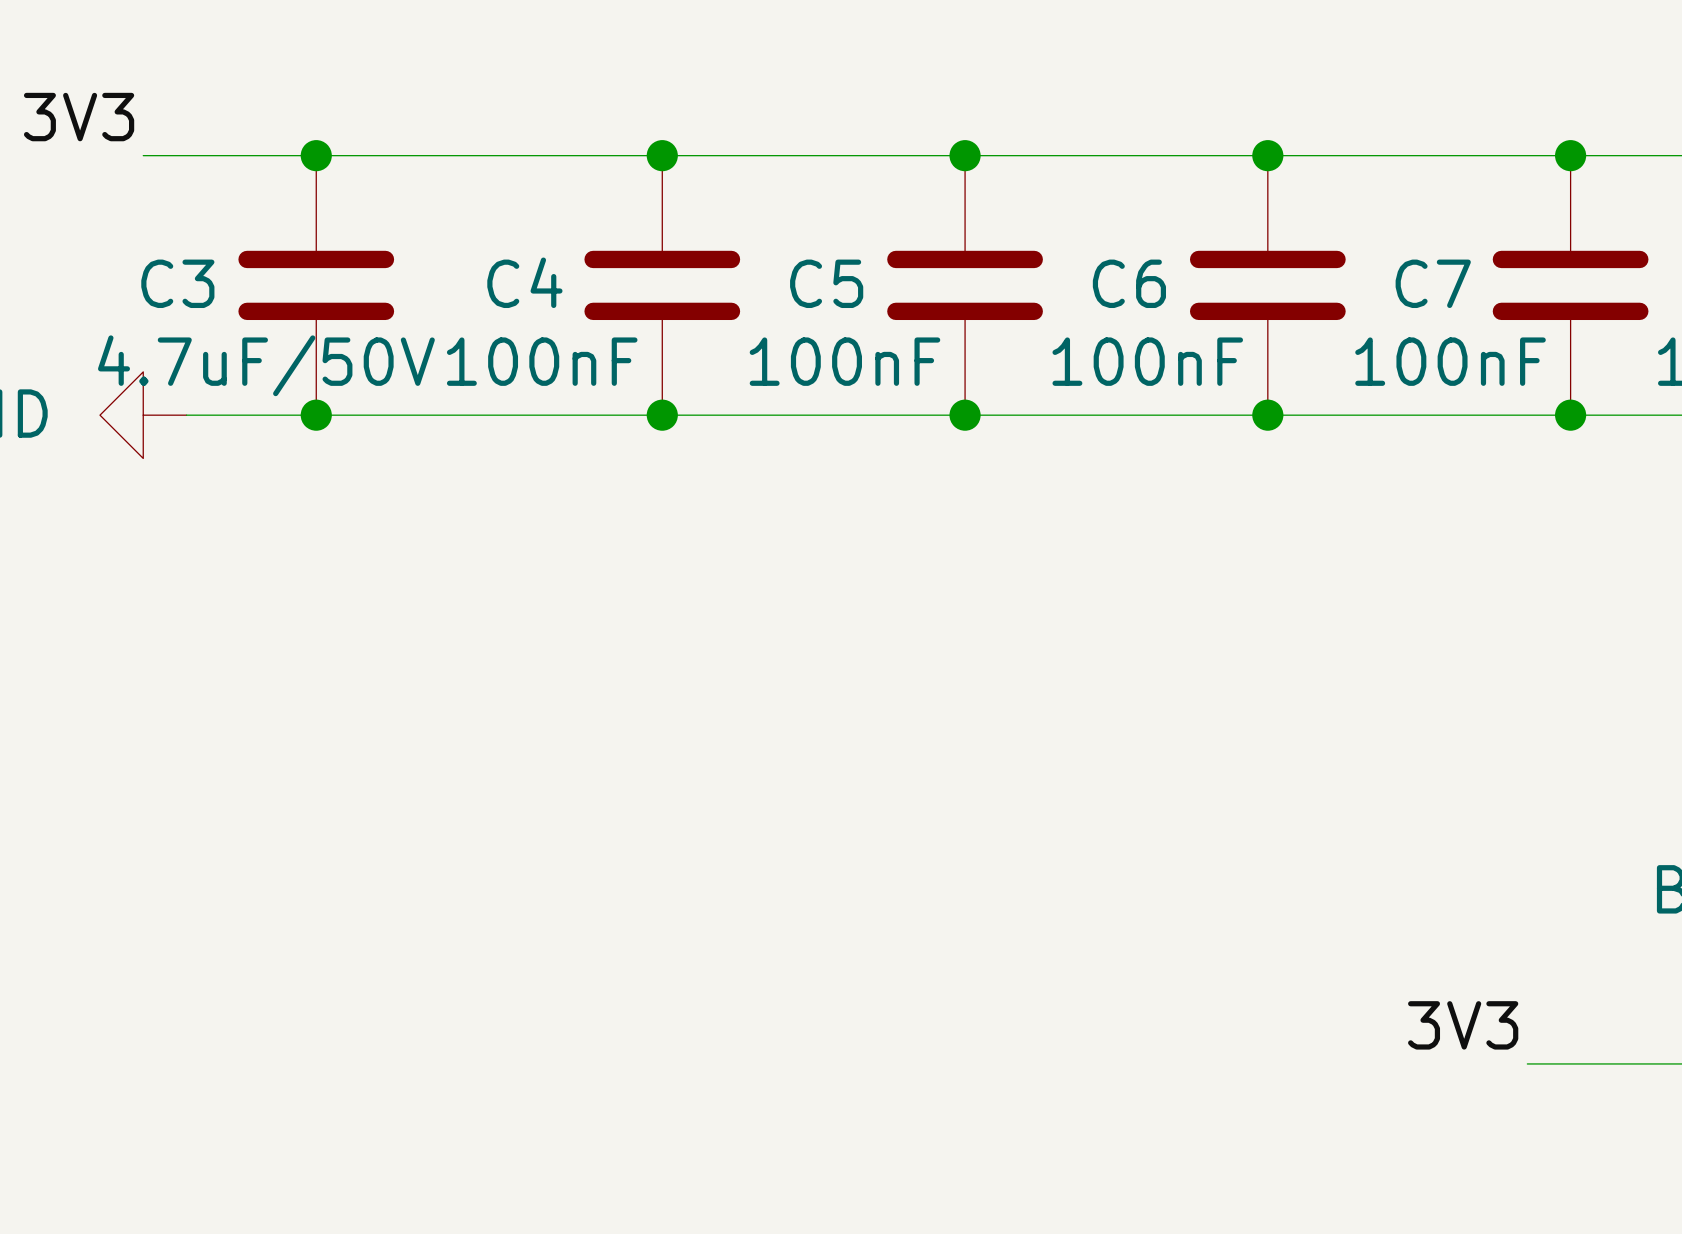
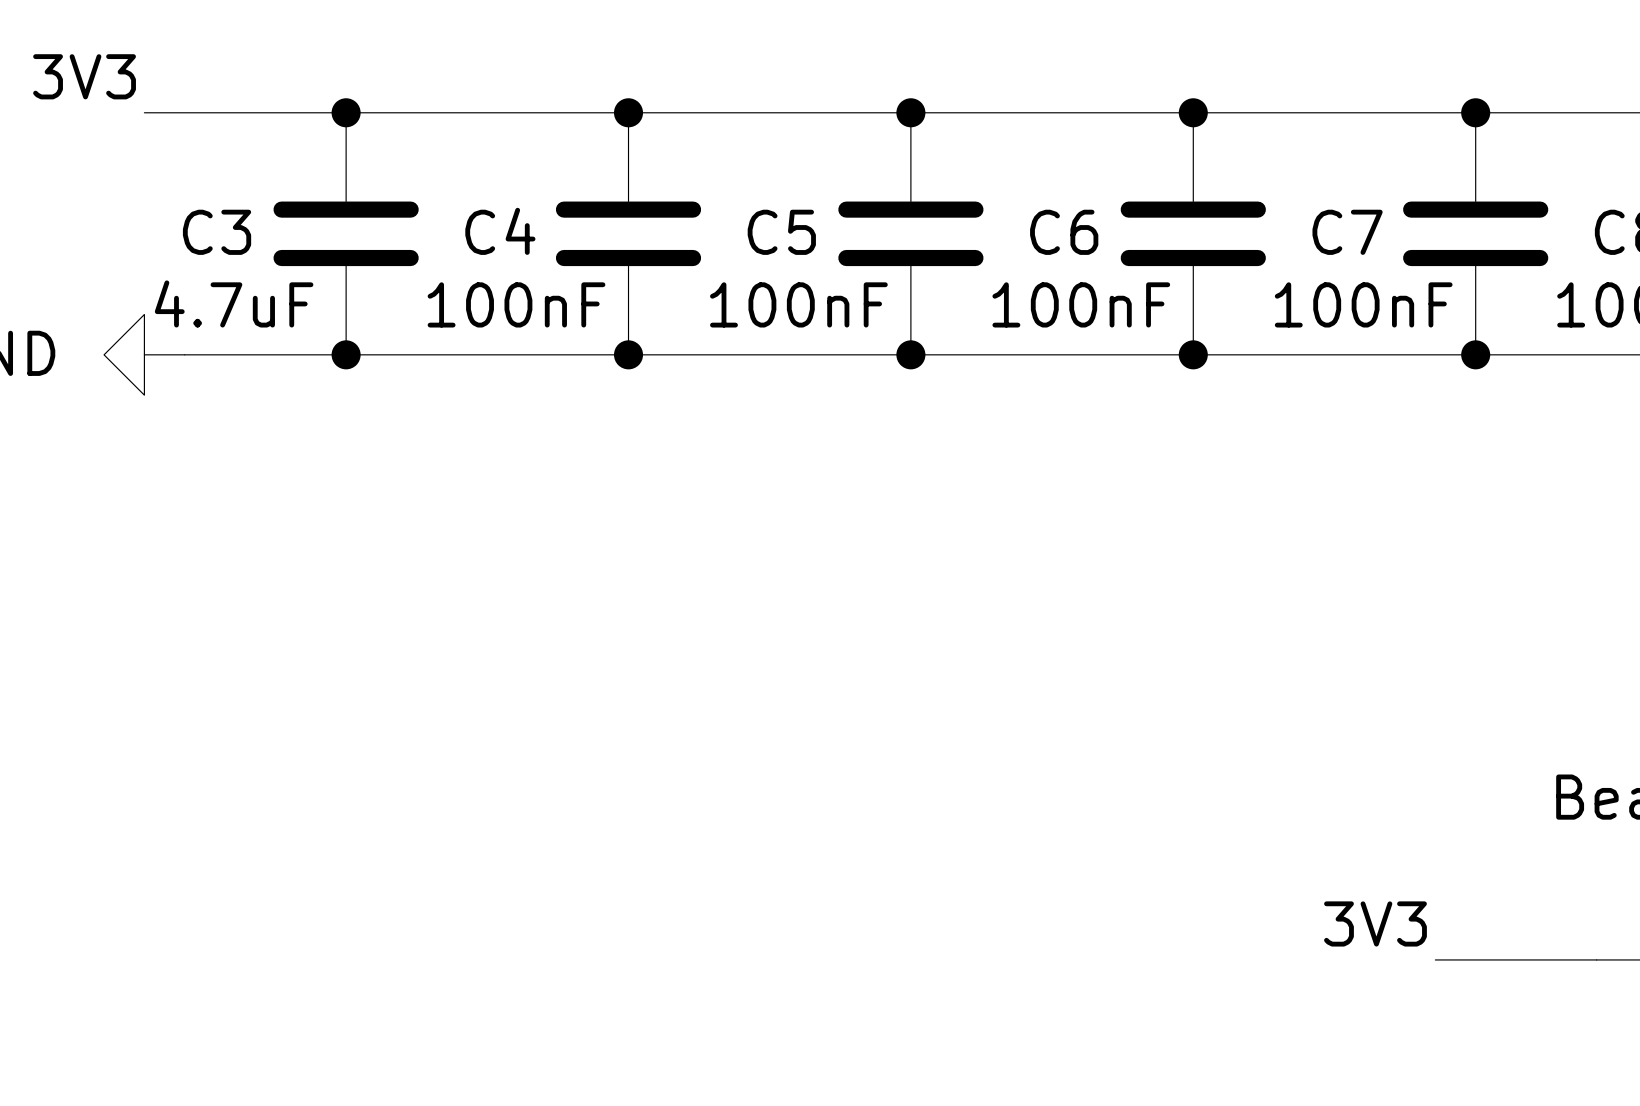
junction position: (316, 155) -> (346, 112)
C3 position: (316, 285) -> (346, 233)
C3 value: 4.7uF/50V (266, 365) -> 4.7uF (234, 303)
junction position: (316, 415) -> (346, 354)

